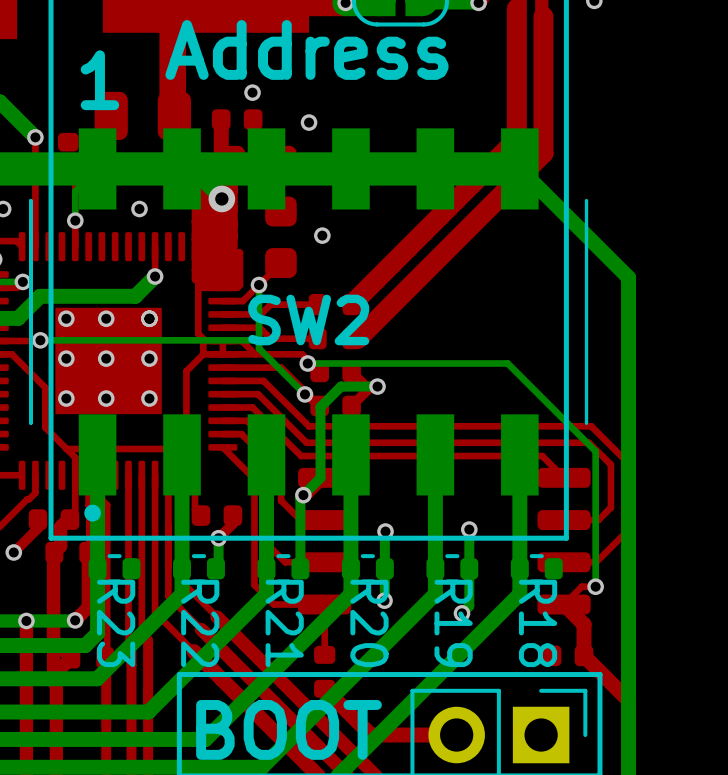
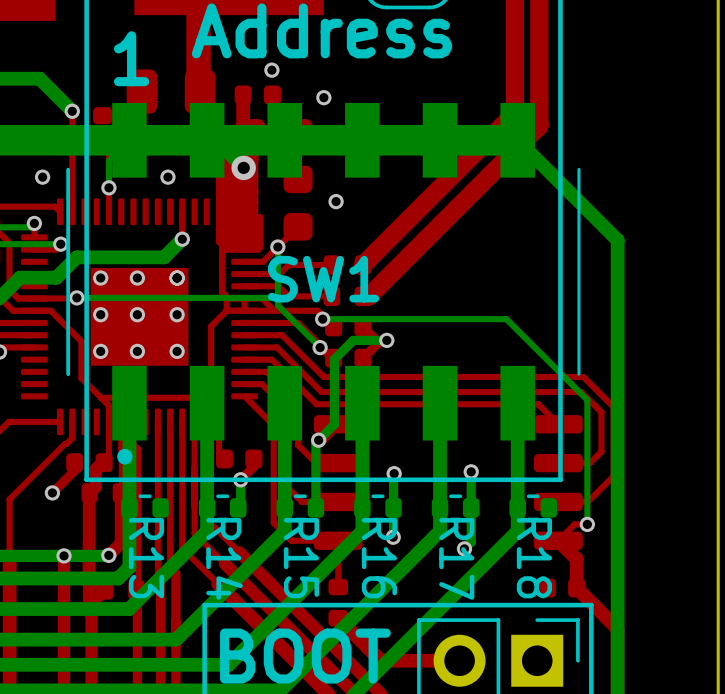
SW2 name: SW2 (308, 319) -> SW1 (323, 279)
R23 name: R23 (116, 623) -> R13 (146, 558)
R22 name: R22 (200, 623) -> R14 (224, 558)
R21 name: R21 (284, 623) -> R15 (301, 558)
R20 name: R20 (369, 623) -> R16 (379, 558)
R19 name: R19 (453, 623) -> R17 (456, 558)

